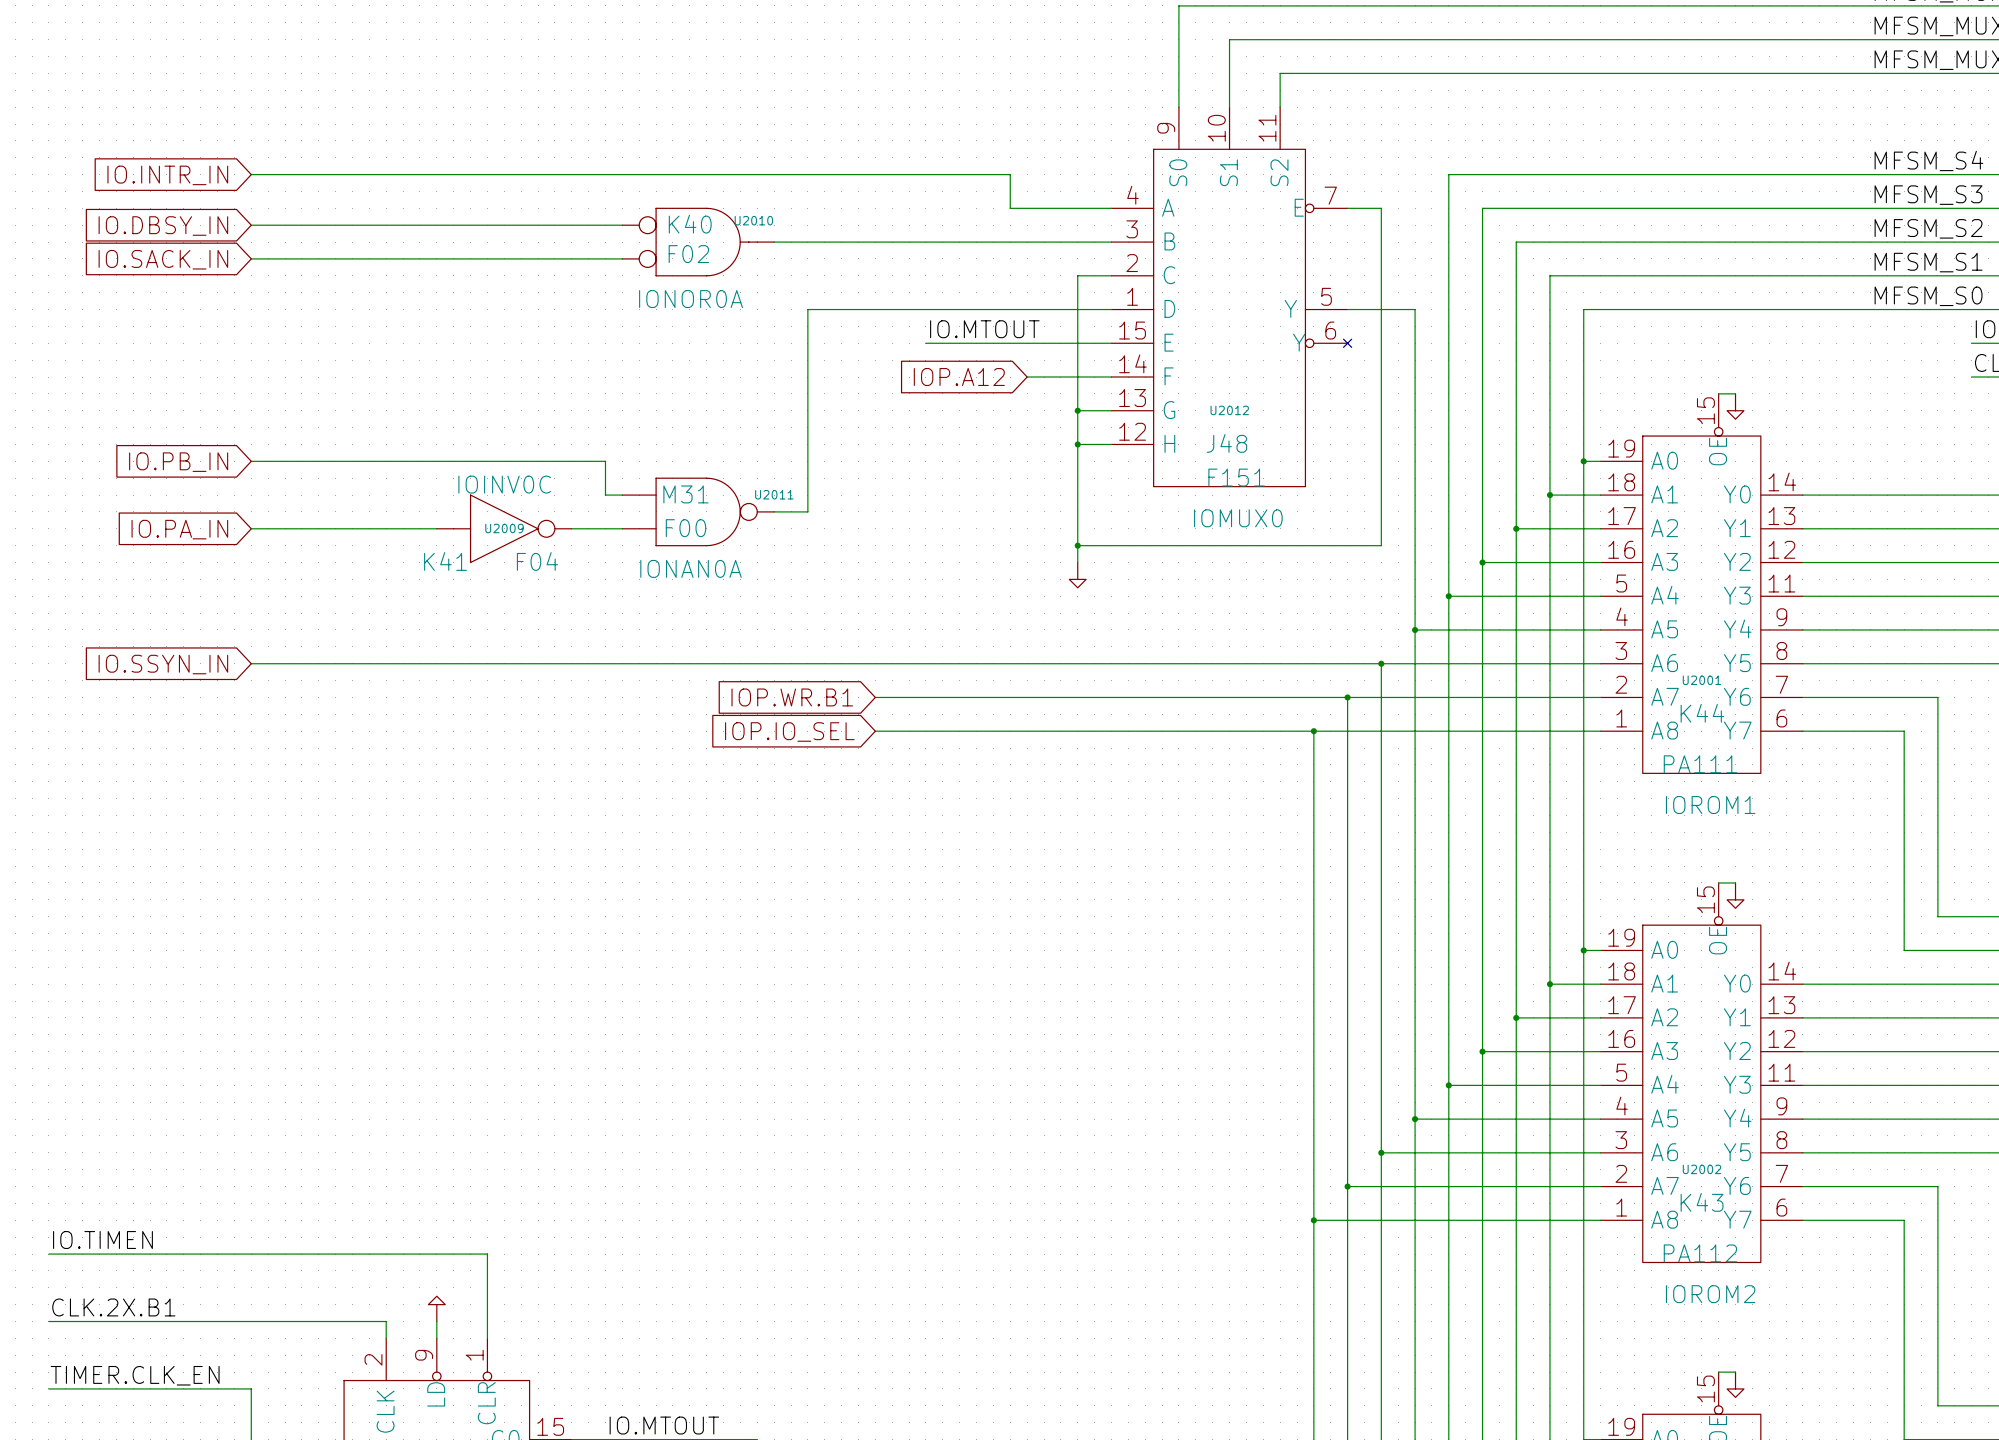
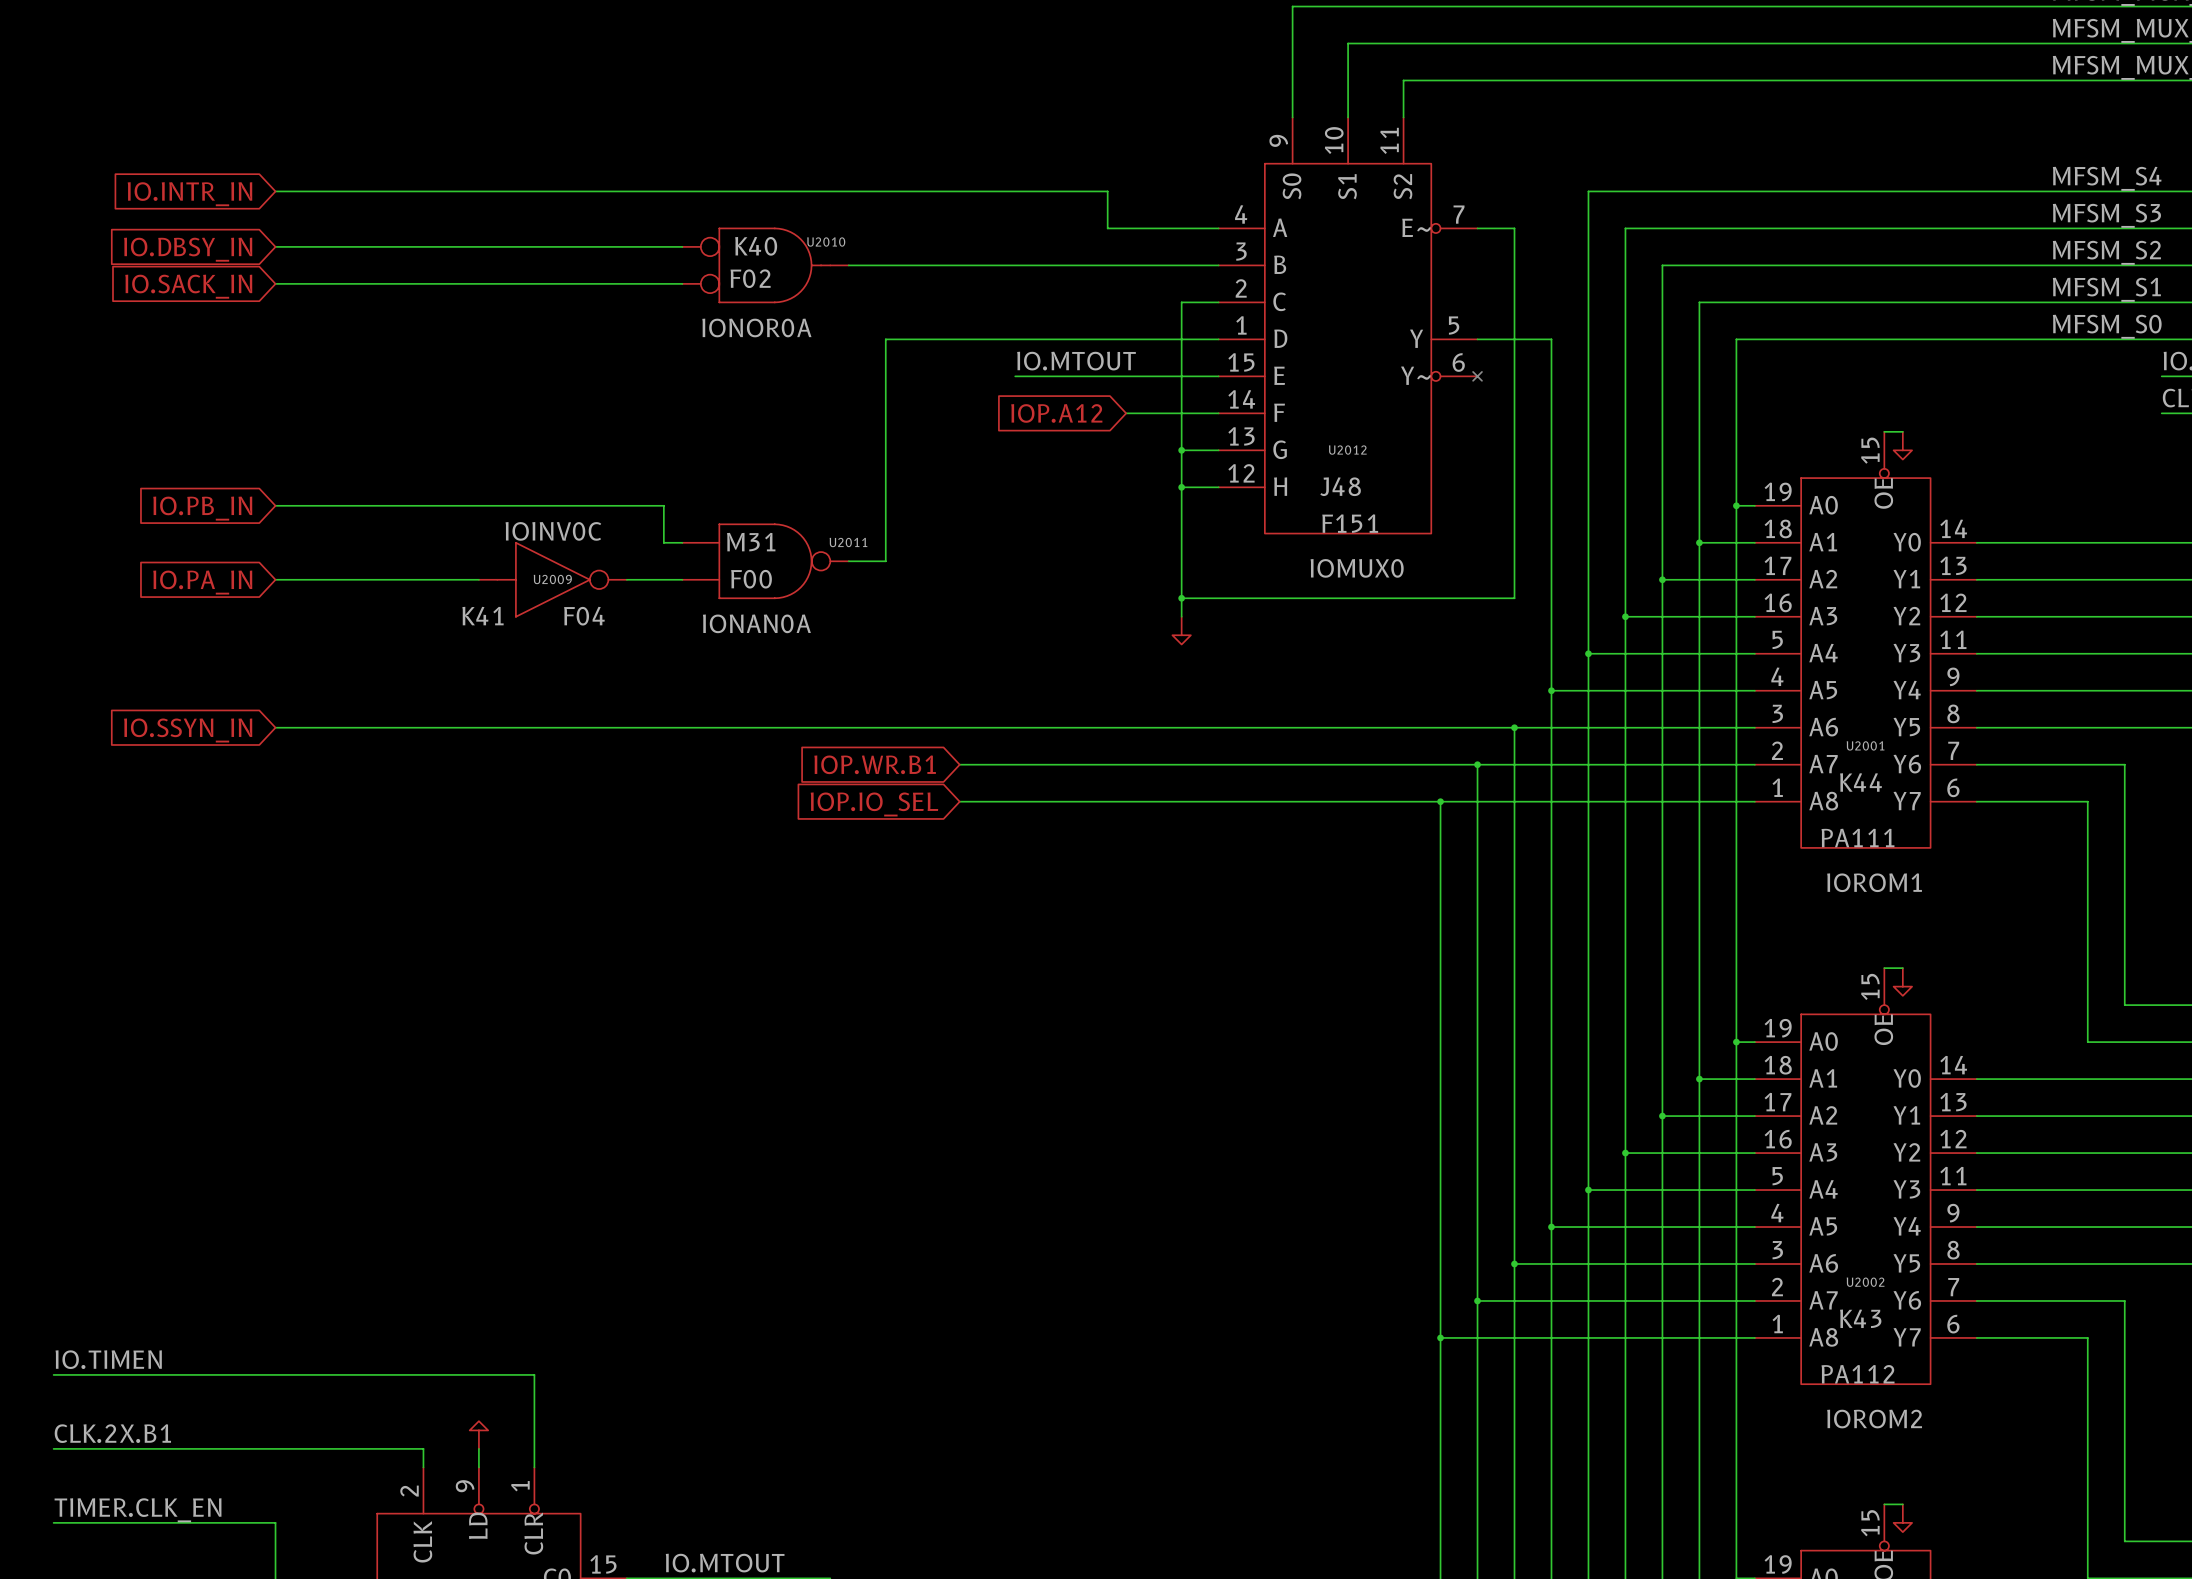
U2012 pin name: E (1299, 207) -> E~ (1416, 227)
U2012 pin name: Y (1299, 342) -> Y~ (1415, 375)

